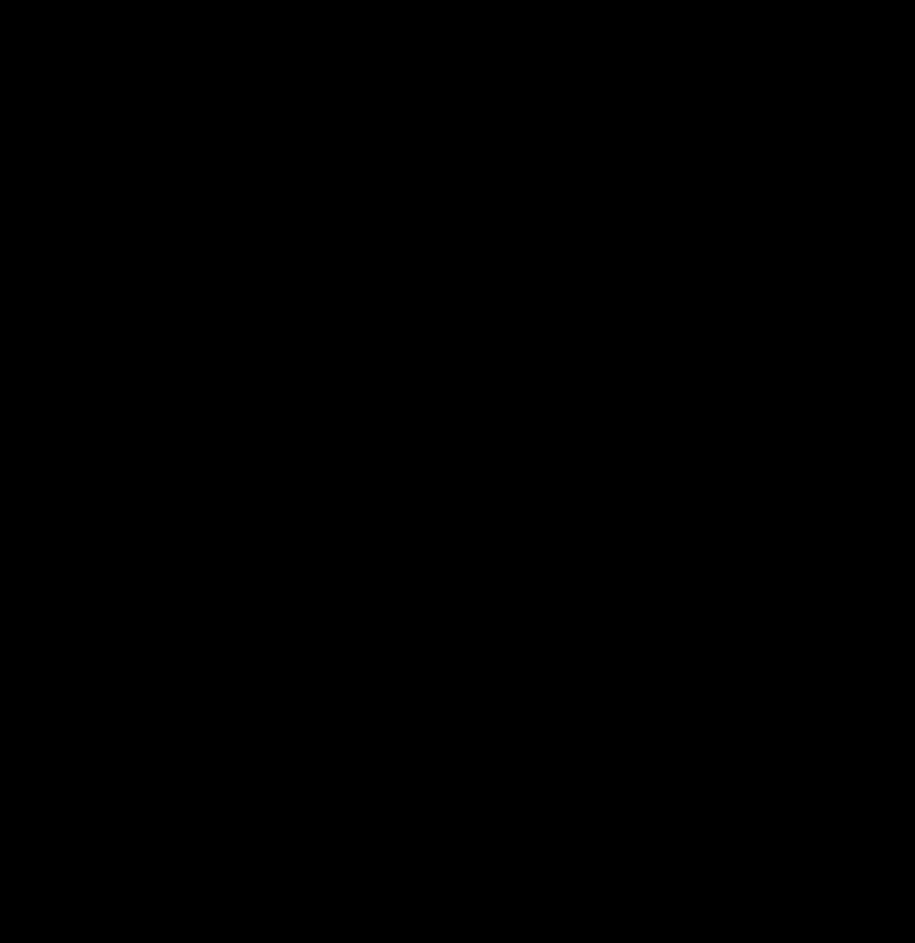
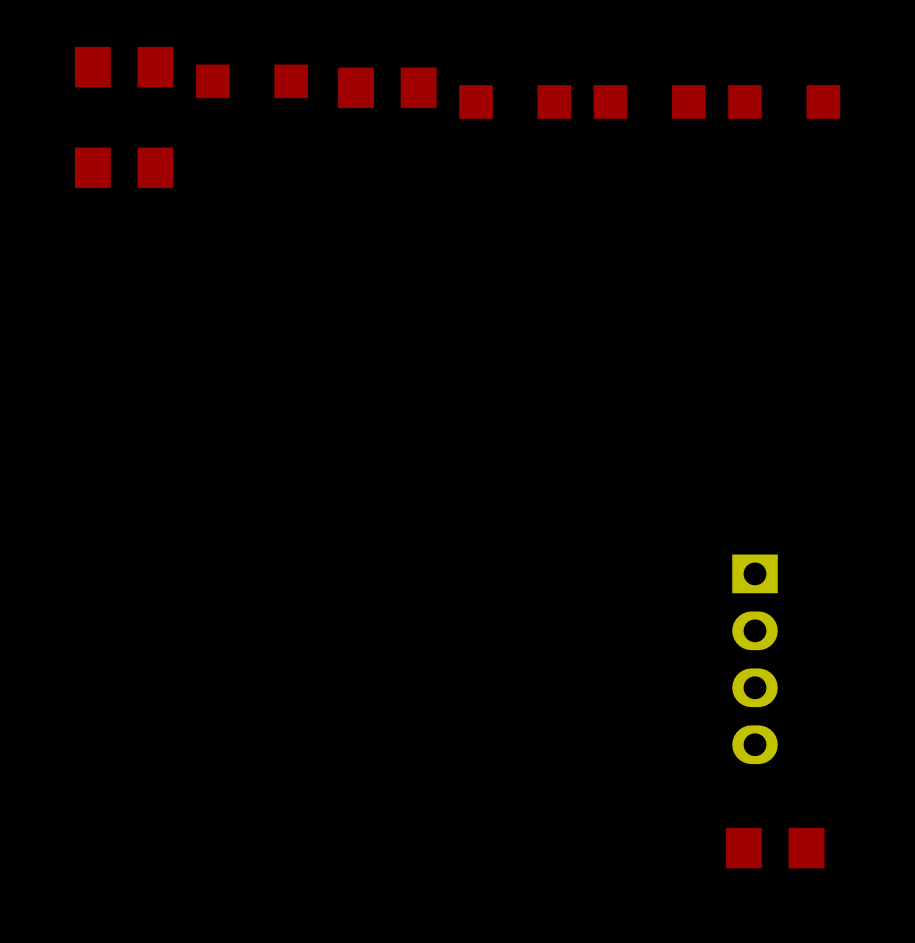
part: none -> (124, 67)
part: none -> (251, 81)
part: none -> (387, 87)
part: none -> (515, 101)
part: none -> (649, 101)
part: none -> (784, 101)
part: none -> (124, 167)
part: none -> (755, 659)
part: none -> (775, 848)

